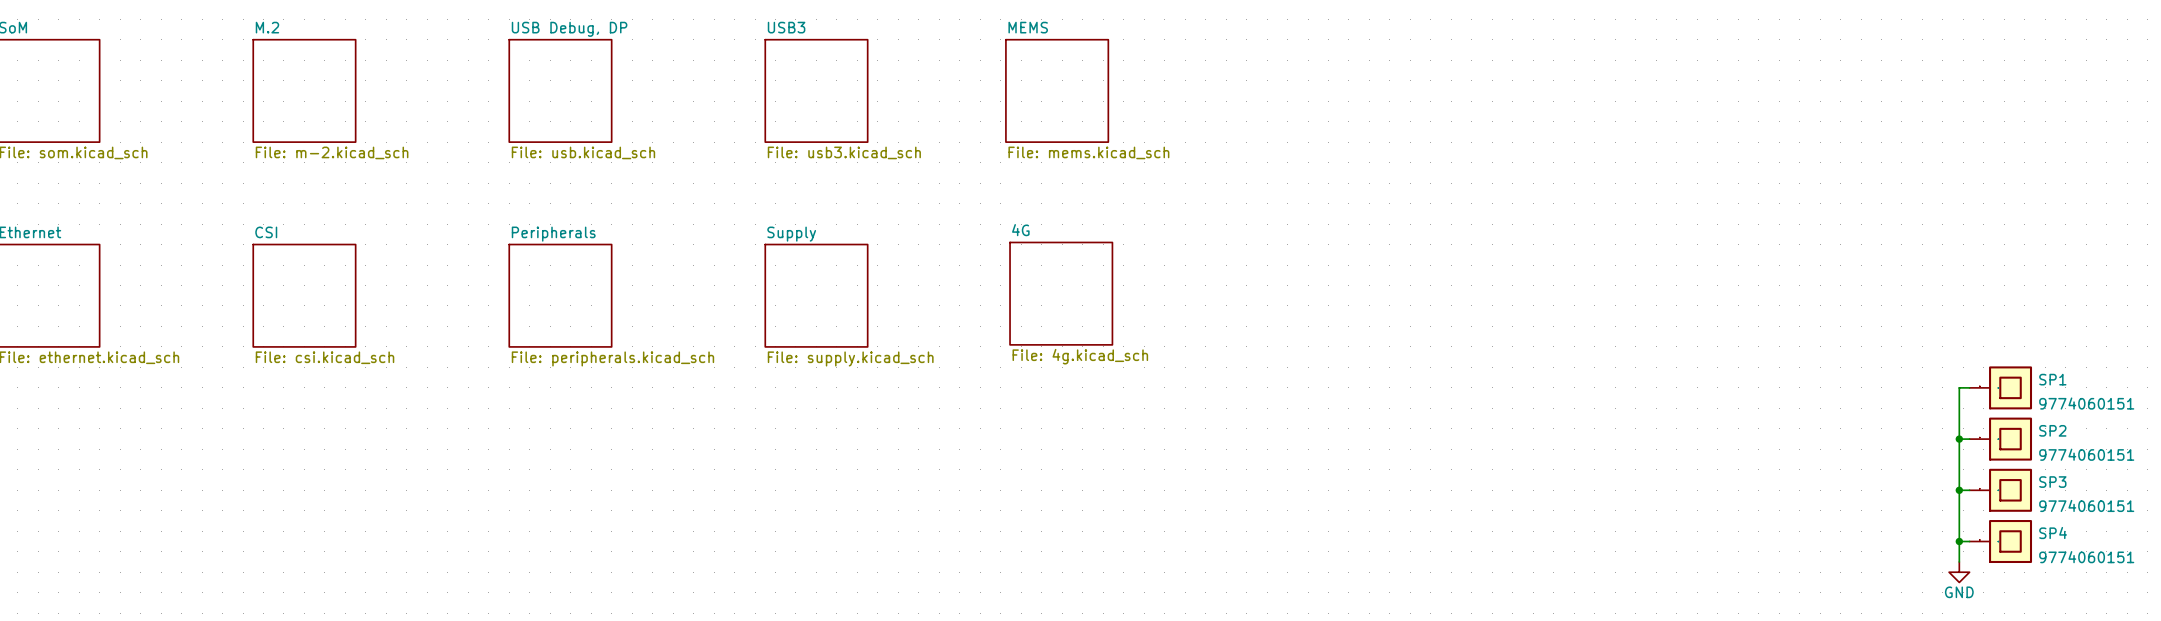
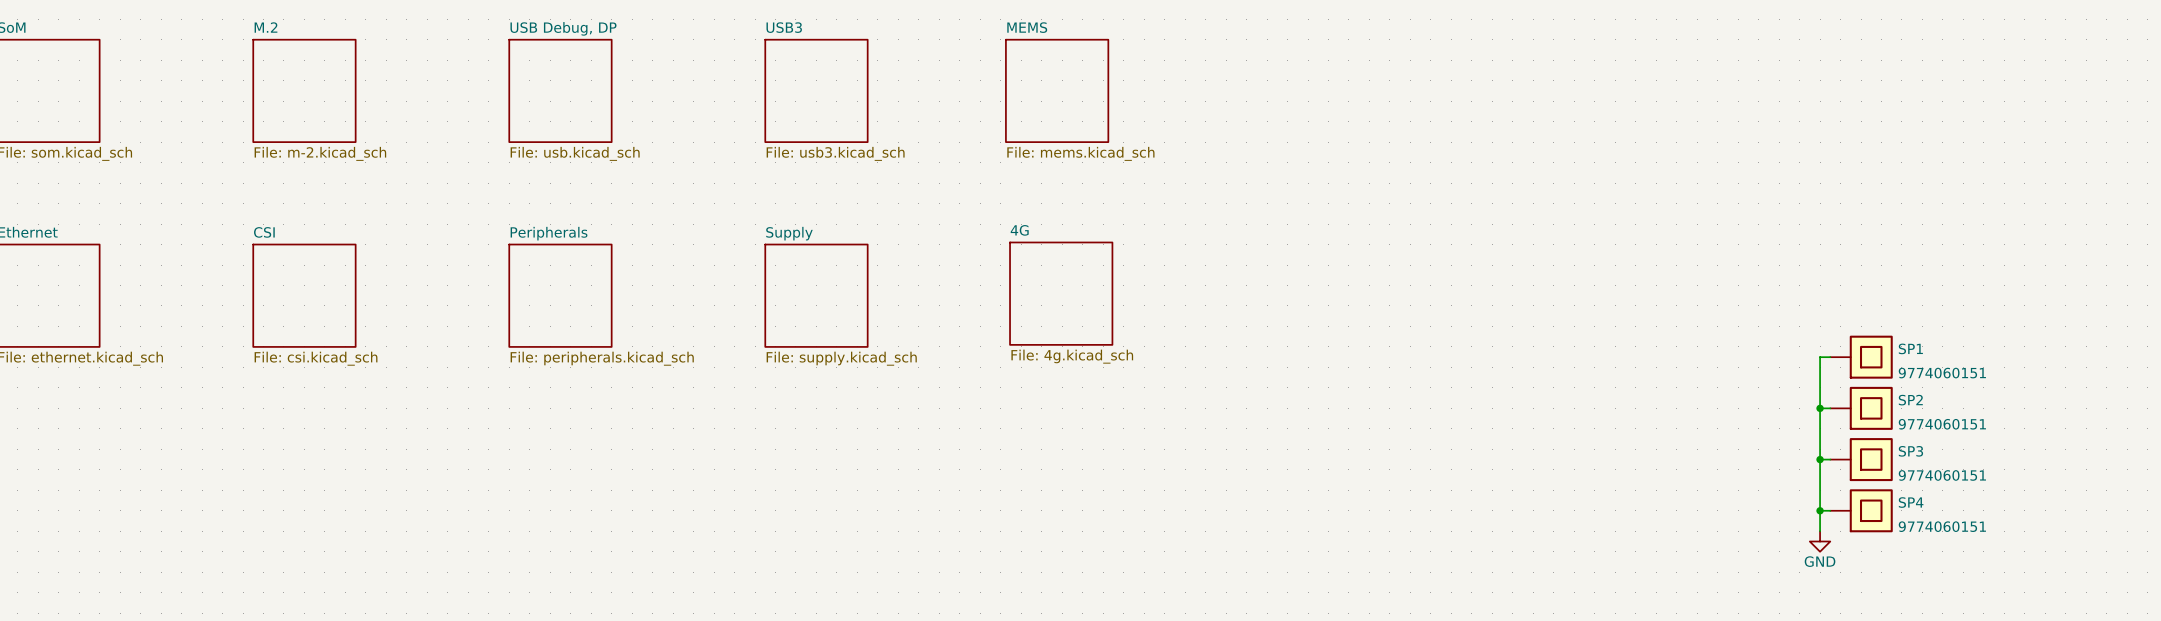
wire: (1969, 387) (1959, 387) (1959, 561) -> (1830, 357) (1820, 357) (1820, 531)
SP1 position: (2000, 387) -> (1861, 357)
junction: none -> (1820, 408)
wire: (1959, 439) (1969, 439) -> (1820, 408) (1830, 408)
junction: (1959, 439) -> none
SP2 position: (2000, 439) -> (1861, 408)
junction: none -> (1820, 459)
wire: (1959, 490) (1969, 490) -> (1820, 459) (1830, 459)
junction: (1959, 490) -> none
SP3 position: (2000, 490) -> (1861, 459)
junction: none -> (1820, 510)
wire: (1959, 541) (1969, 541) -> (1820, 510) (1830, 510)
junction: (1959, 541) -> none
SP4 position: (2000, 541) -> (1861, 510)
power symbol position: GND (1959, 572) -> GND (1820, 541)

